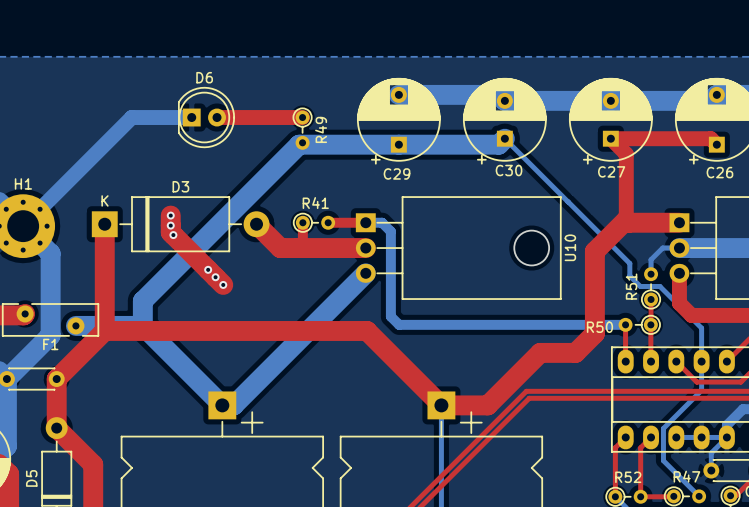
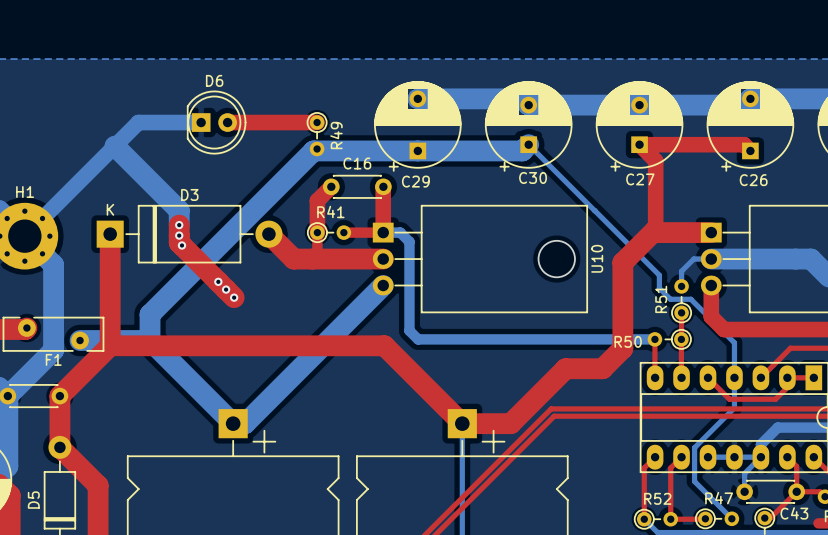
bottom track: none -> (114, 146) (179, 210) (179, 225)
top track: none -> (331, 186) (317, 200) (317, 232)
C16: none -> (357, 186)
top track: none -> (383, 186) (383, 232)

